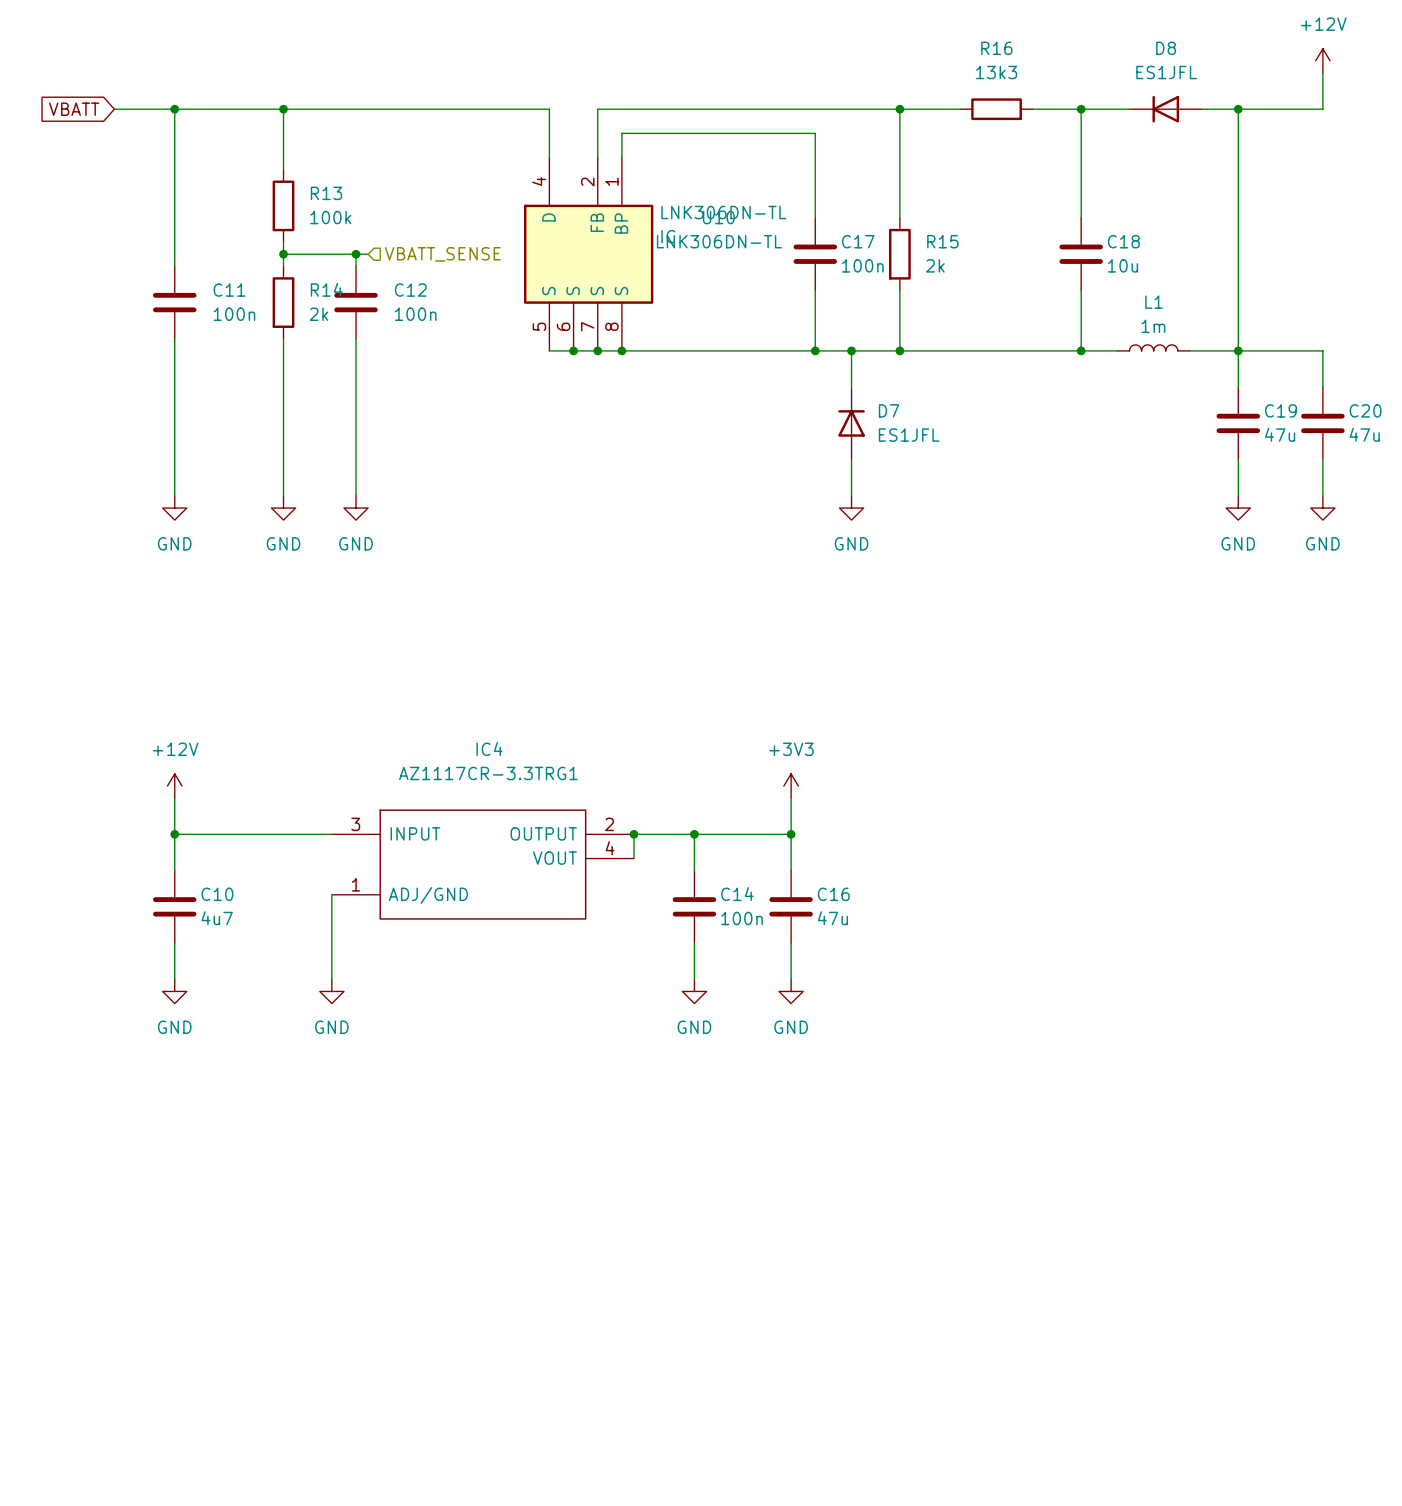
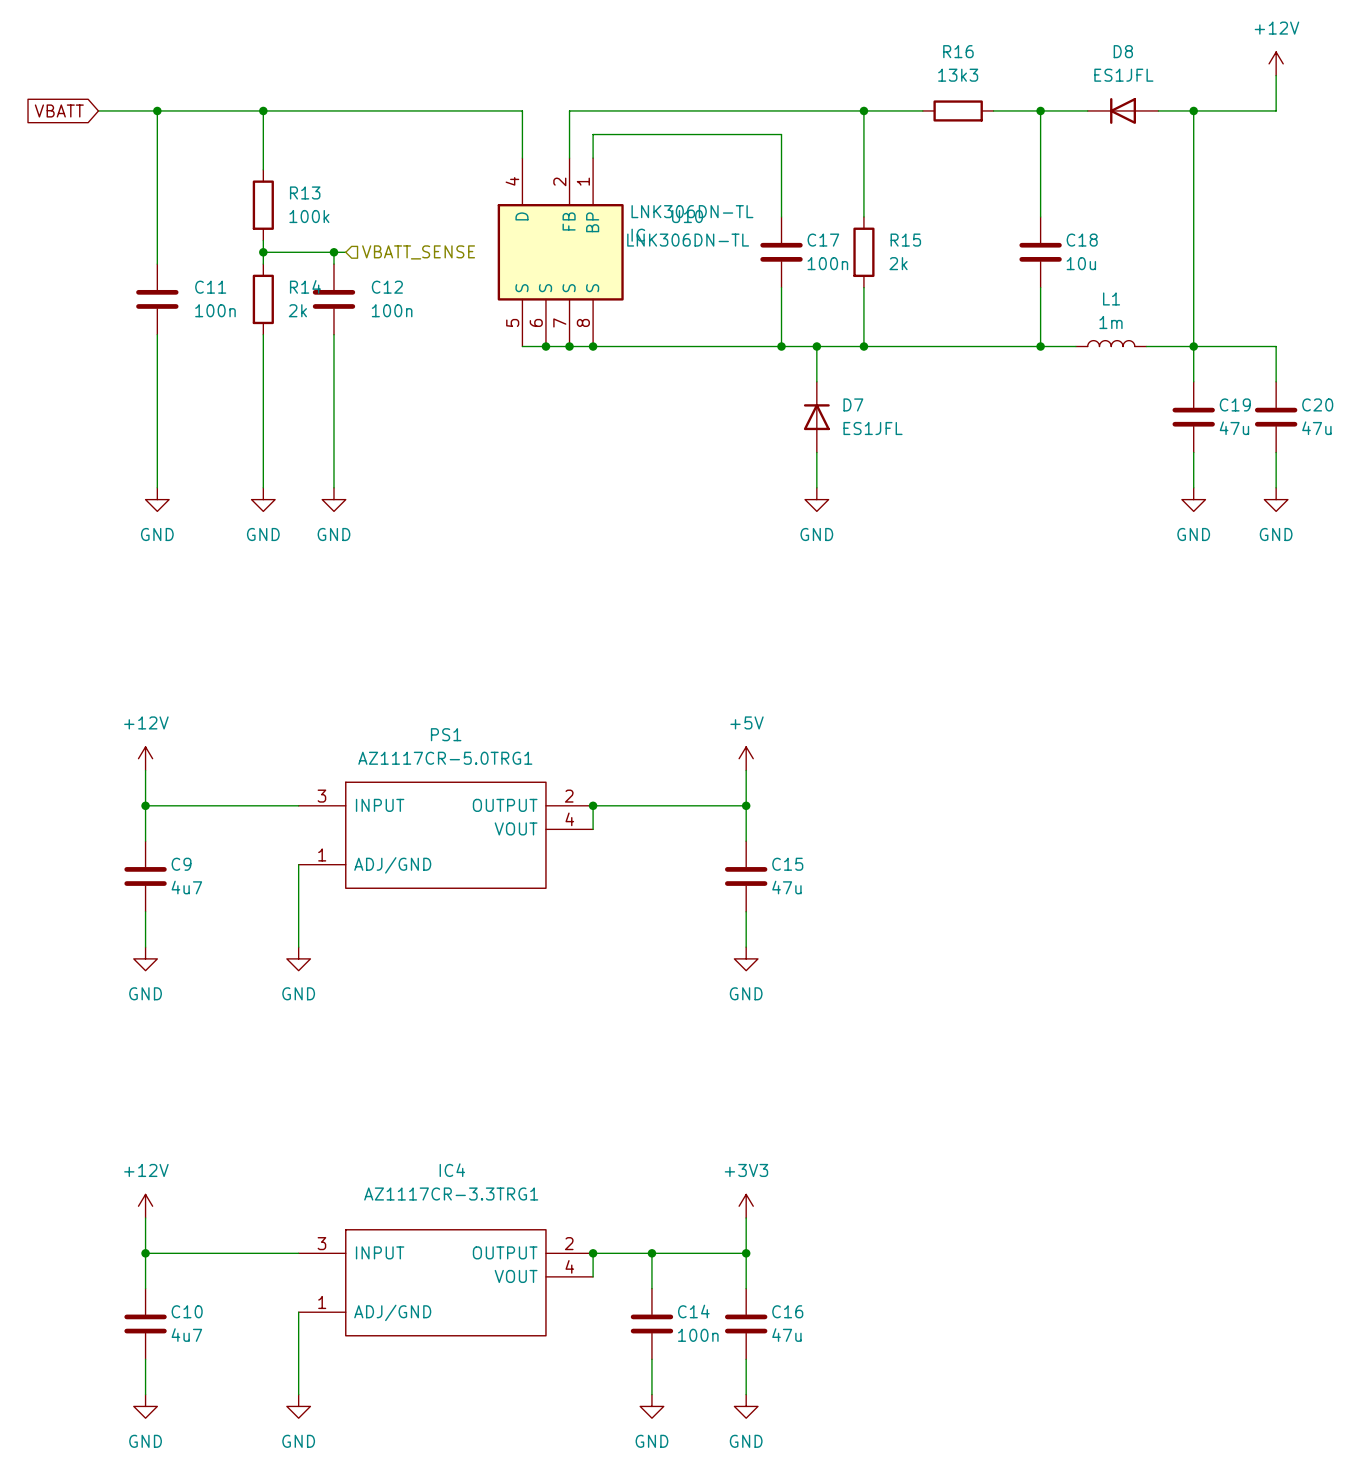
power symbol: none -> +5V (746, 758)
power symbol position: +12V (174, 786) -> +12V (145, 758)
power symbol: +3V3 (791, 786) -> none
wire: (174, 798) (174, 870) -> (145, 770) (145, 841)
wire: (791, 798) (791, 870) -> (746, 770) (746, 841)
wire: (174, 834) (331, 834) -> (145, 805) (298, 805)
junction position: (174, 834) -> (145, 805)
junction position: (634, 834) -> (593, 805)
wire: (694, 834) (694, 870) -> none
junction: (694, 834) -> none
wire: (791, 834) (634, 834) (634, 858) -> (746, 805) (593, 805) (593, 829)
junction position: (791, 834) -> (746, 805)
PS1: none -> AZ1117CR-5.0TRG1 (445, 835)
IC4 position: (482, 864) -> (445, 1282)
C9: none -> 4u7 (145, 876)
wire: (331, 894) (331, 979) -> (298, 864) (298, 947)
C15: none -> 47u (746, 876)
C10 position: (174, 906) -> (145, 1323)
C14 position: (694, 906) -> (651, 1323)
C16 position: (791, 906) -> (746, 1323)
wire: (174, 943) (174, 979) -> (145, 911) (145, 947)
wire: (694, 943) (694, 979) -> none
wire: (791, 943) (791, 979) -> (746, 911) (746, 947)
power symbol position: GND (174, 991) -> GND (145, 958)
power symbol position: GND (331, 991) -> GND (298, 958)
power symbol: GND (694, 991) -> none
power symbol position: GND (791, 991) -> GND (746, 958)
power symbol: none -> +12V (145, 1206)
power symbol: none -> +3V3 (746, 1206)
wire: none -> (145, 1218) (145, 1288)
wire: none -> (746, 1218) (746, 1288)
wire: none -> (145, 1253) (298, 1253)
junction: none -> (145, 1253)
junction: none -> (593, 1253)
wire: none -> (651, 1253) (651, 1288)
junction: none -> (651, 1253)
wire: none -> (746, 1253) (593, 1253) (593, 1276)
junction: none -> (746, 1253)
wire: none -> (298, 1312) (298, 1394)
wire: none -> (145, 1359) (145, 1394)
wire: none -> (651, 1359) (651, 1394)
wire: none -> (746, 1359) (746, 1394)
power symbol: none -> GND (145, 1406)
power symbol: none -> GND (298, 1406)
power symbol: none -> GND (651, 1406)
power symbol: none -> GND (746, 1406)

